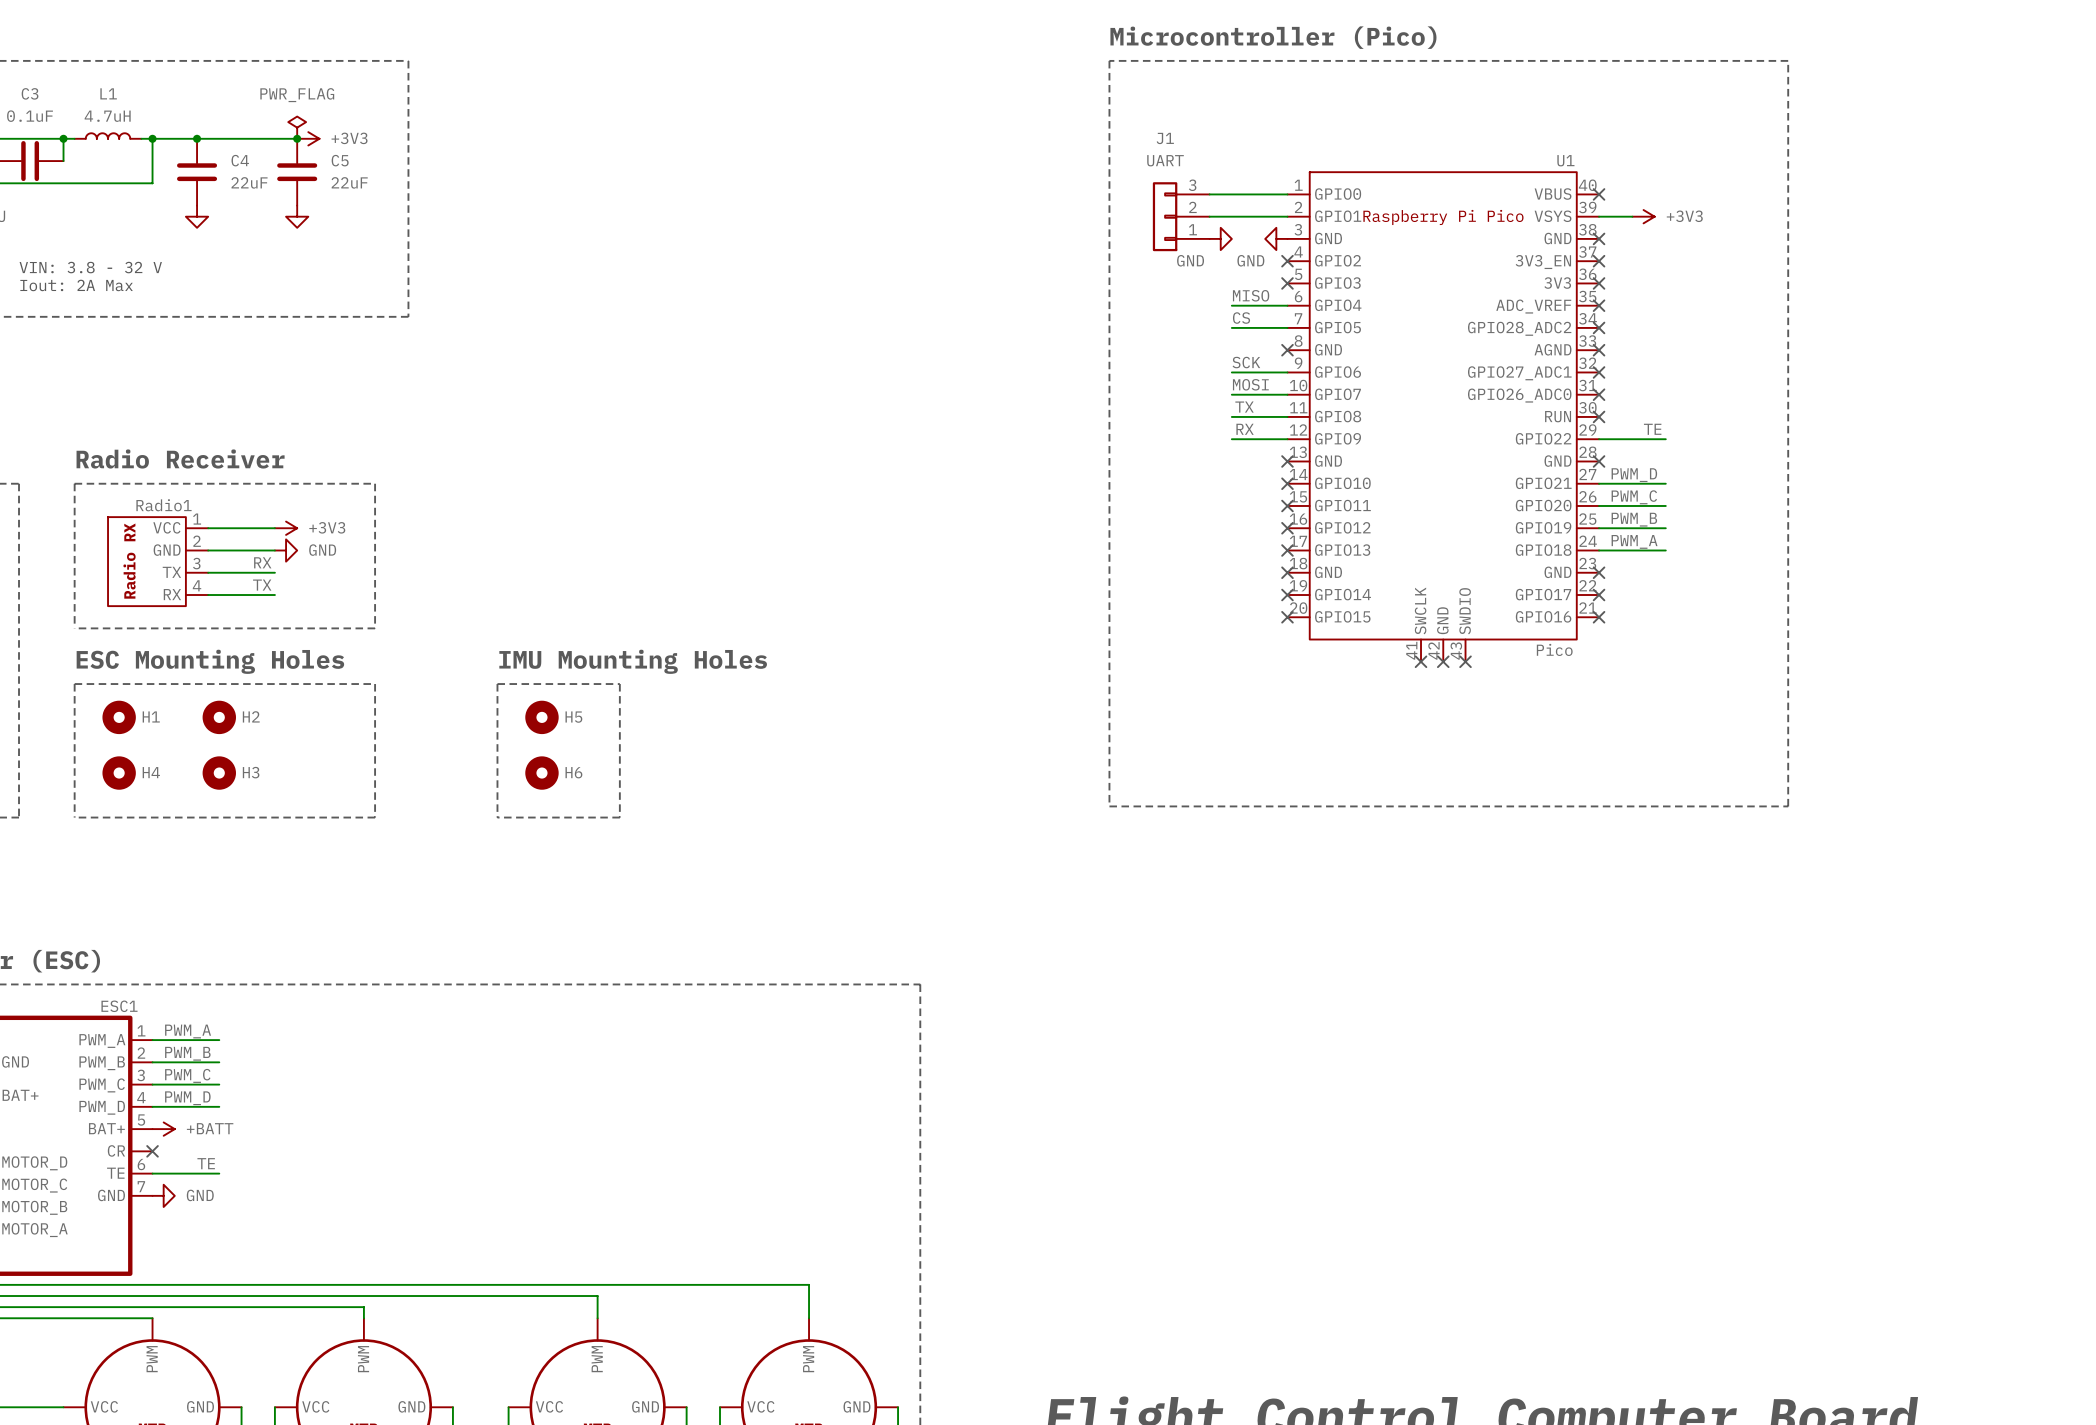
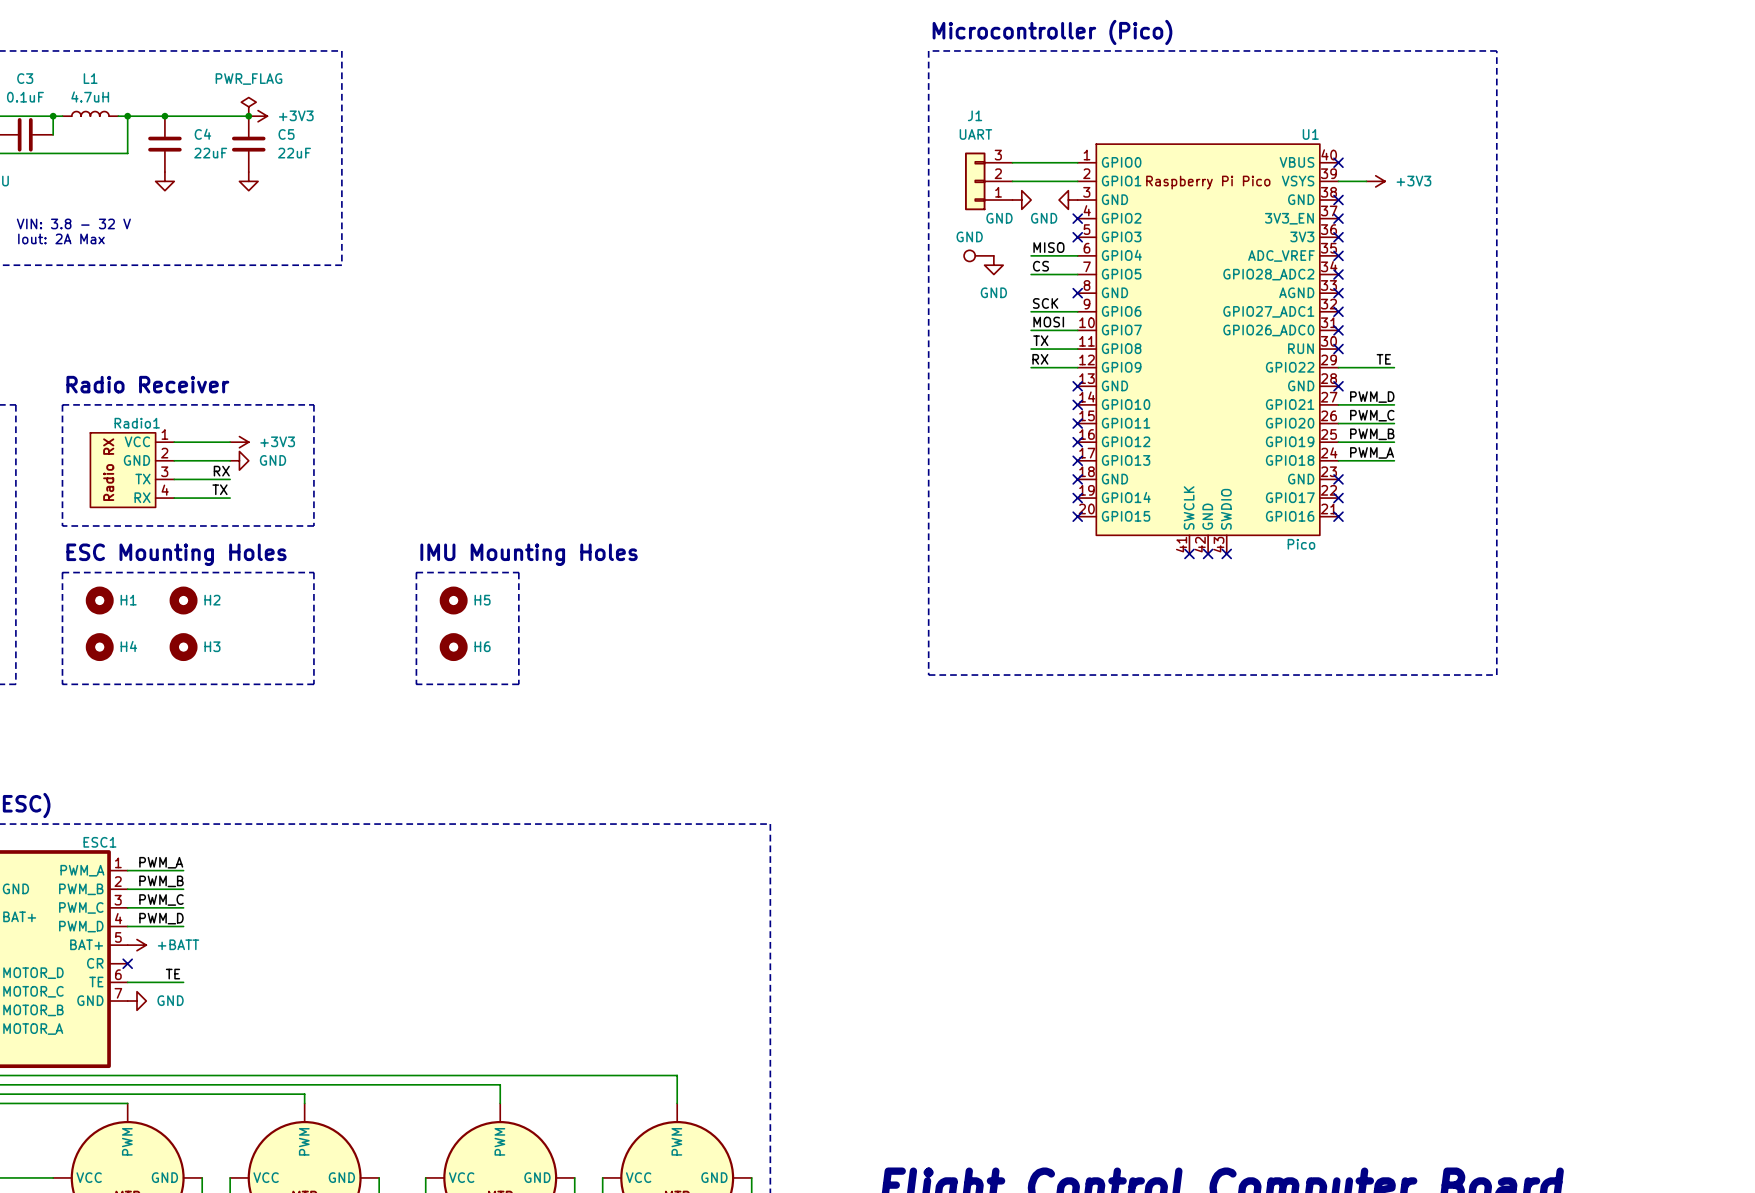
part: none -> GND (978, 255)
power symbol: none -> GND (993, 265)

